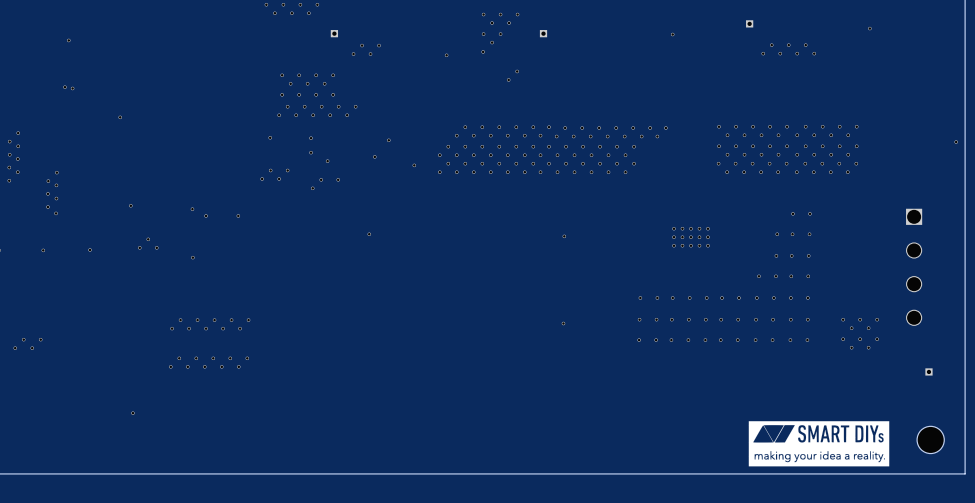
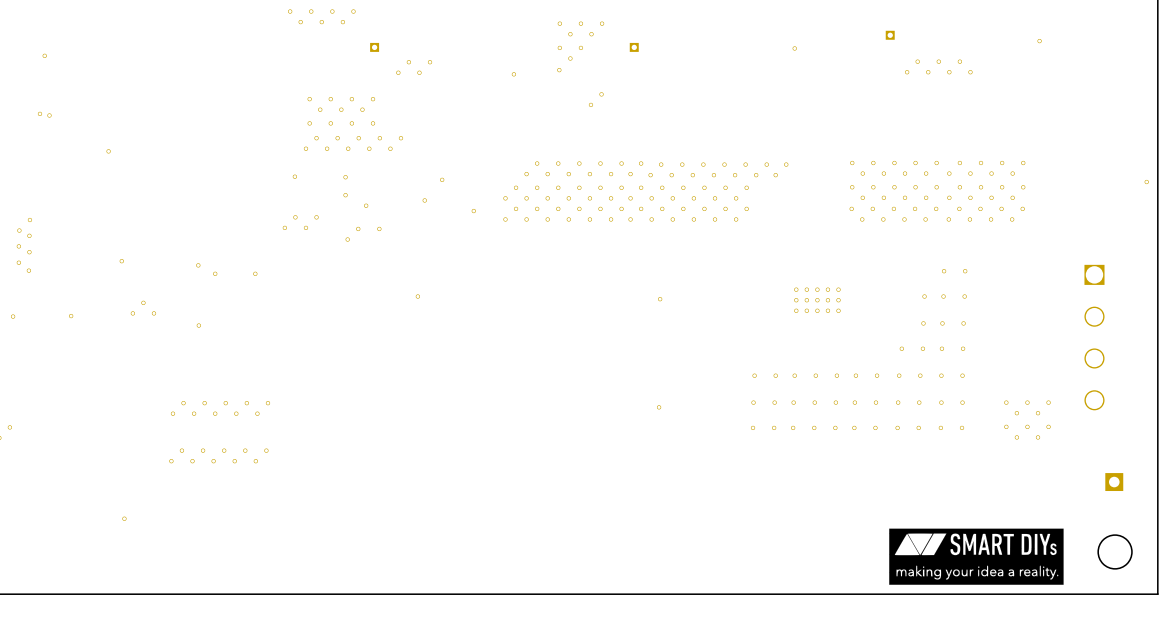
part: (928, 371) -> none
part: none -> (1114, 482)

